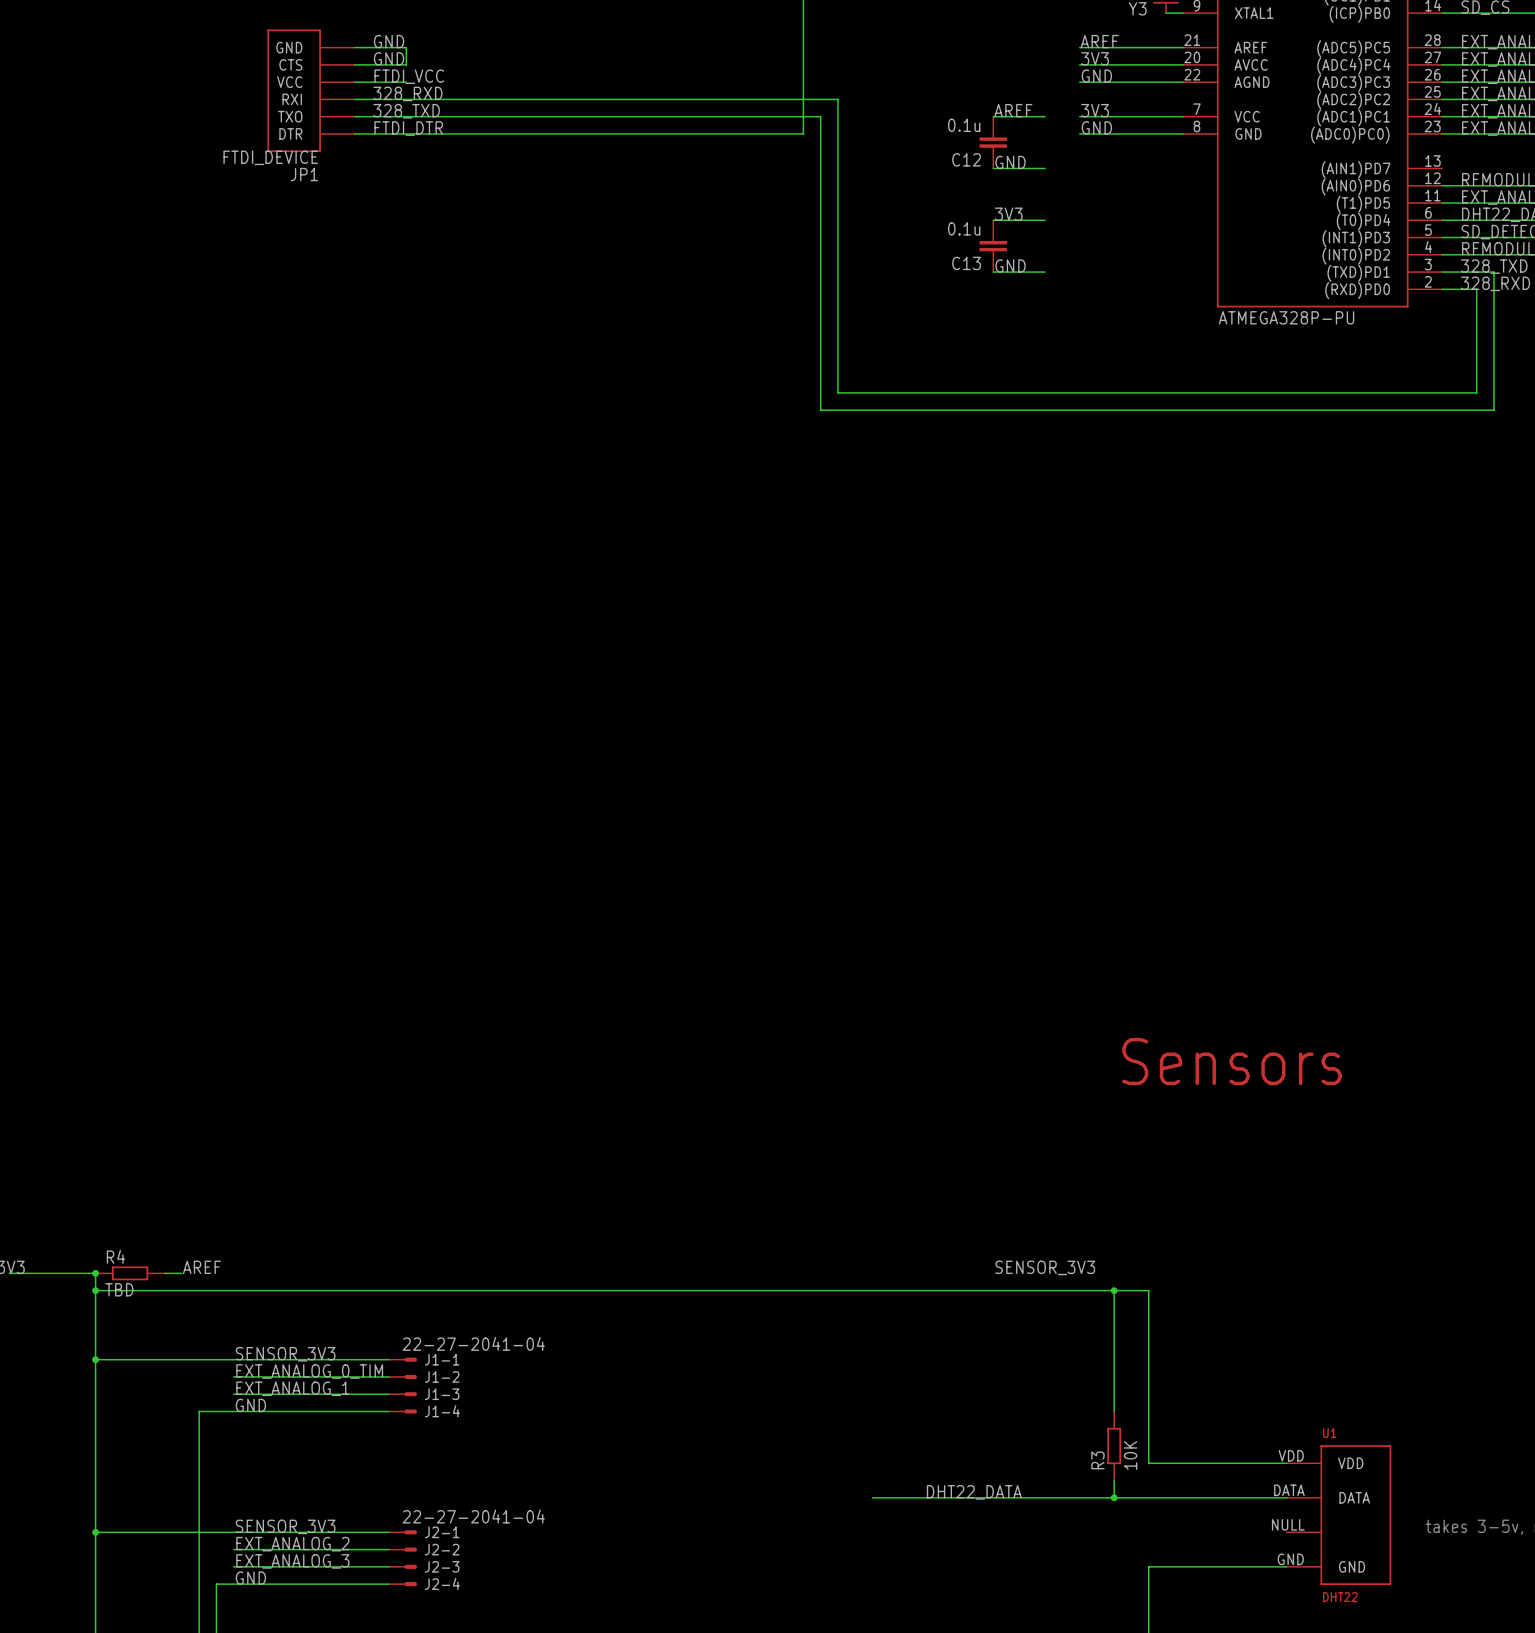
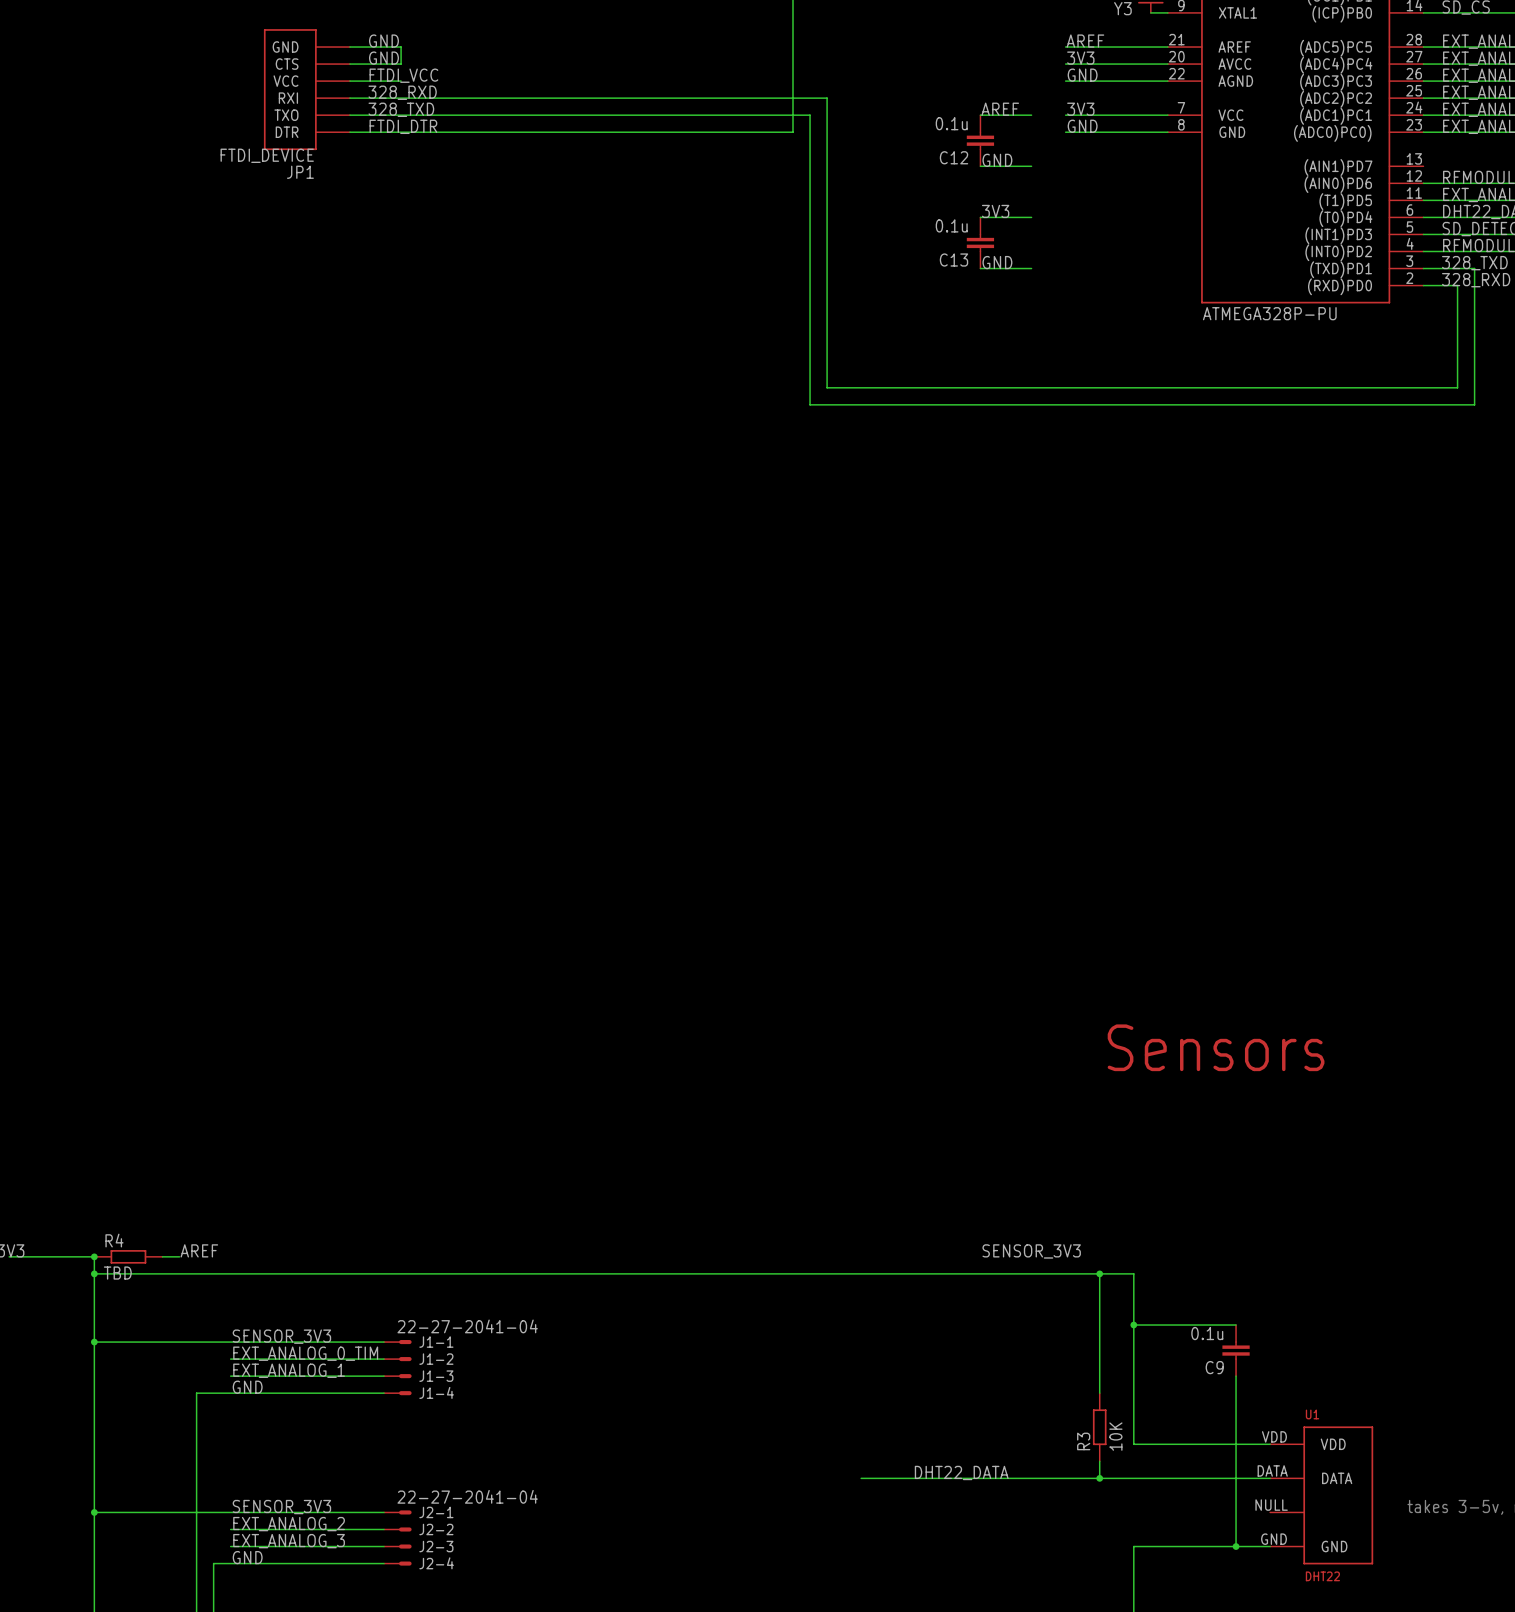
wire: none -> (1133, 1325) (1236, 1325)
junction: none -> (1133, 1325)
C9: none -> 0.1u (1236, 1350)
wire: none -> (1236, 1376) (1236, 1546)
junction: none -> (1236, 1546)

